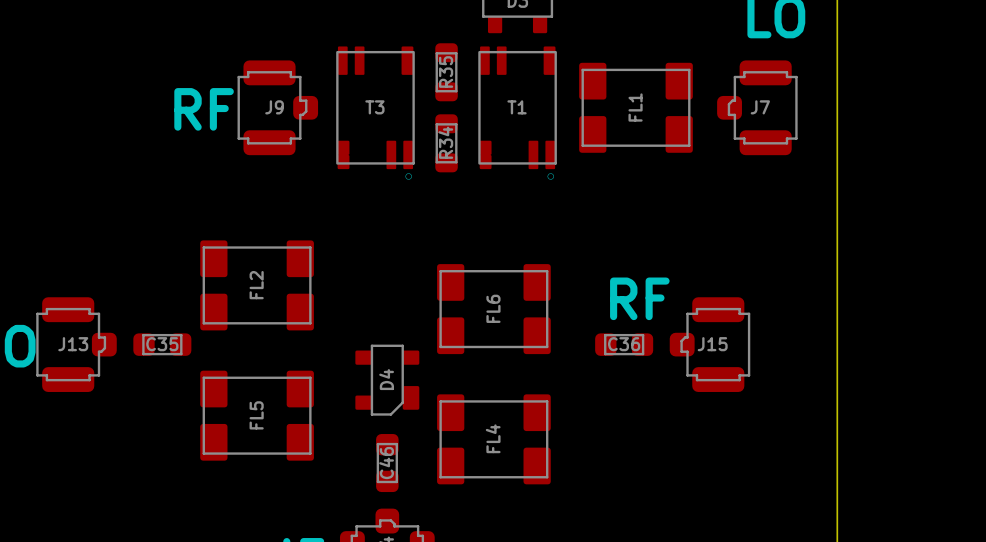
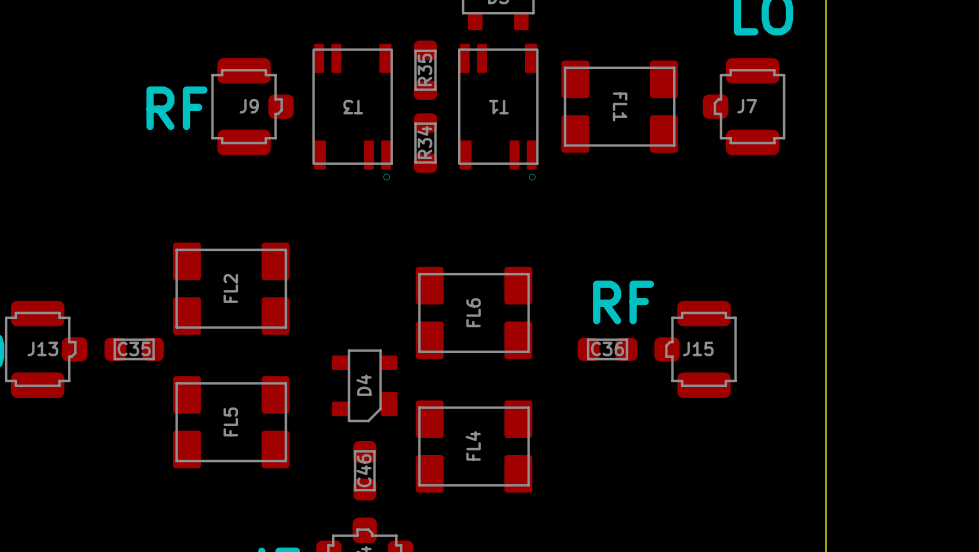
T3 name rotation: 0° (374, 107) -> 180° (353, 107)
T1 name rotation: 0° (517, 107) -> 180° (498, 107)
FL1 name rotation: 0° (635, 107) -> 180° (620, 106)

